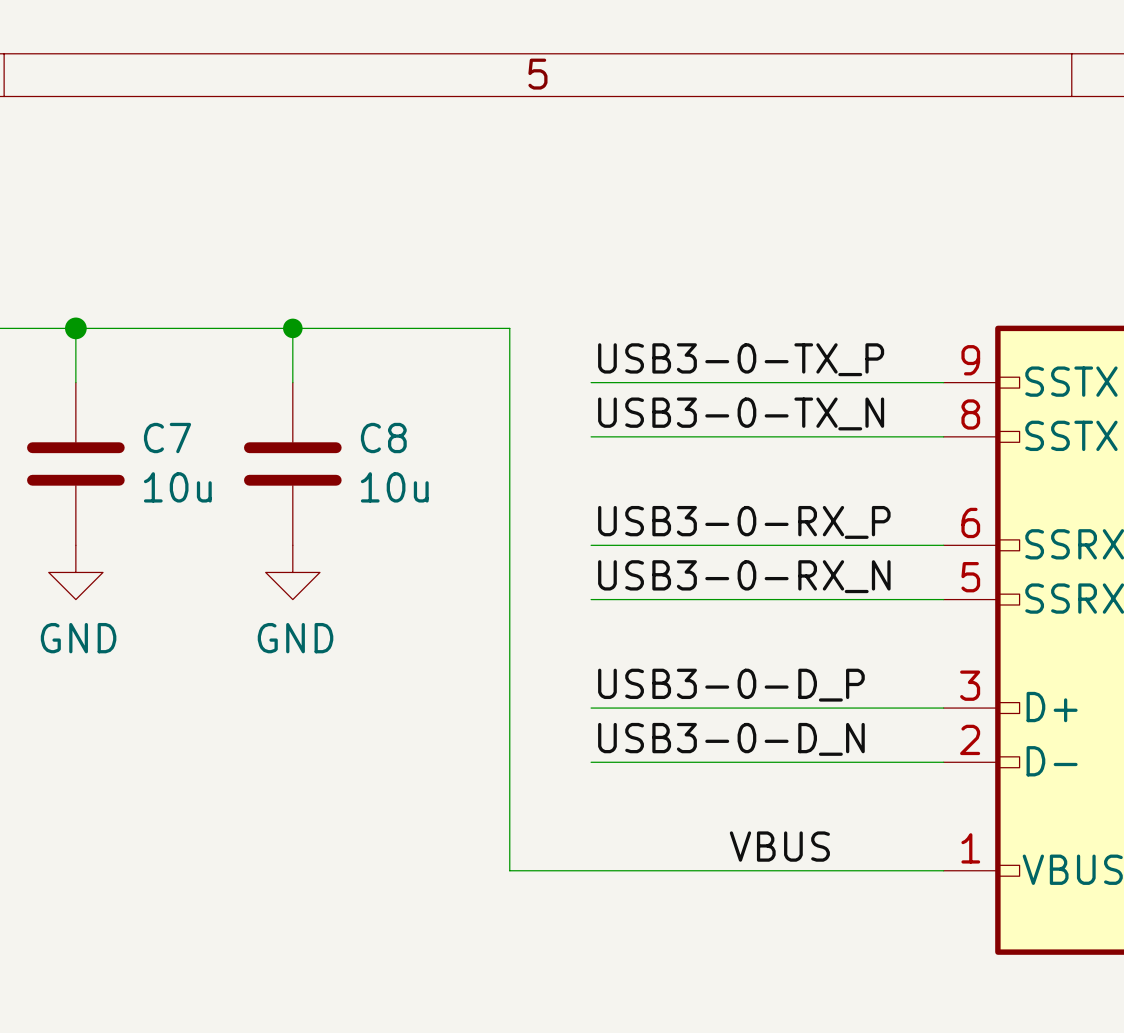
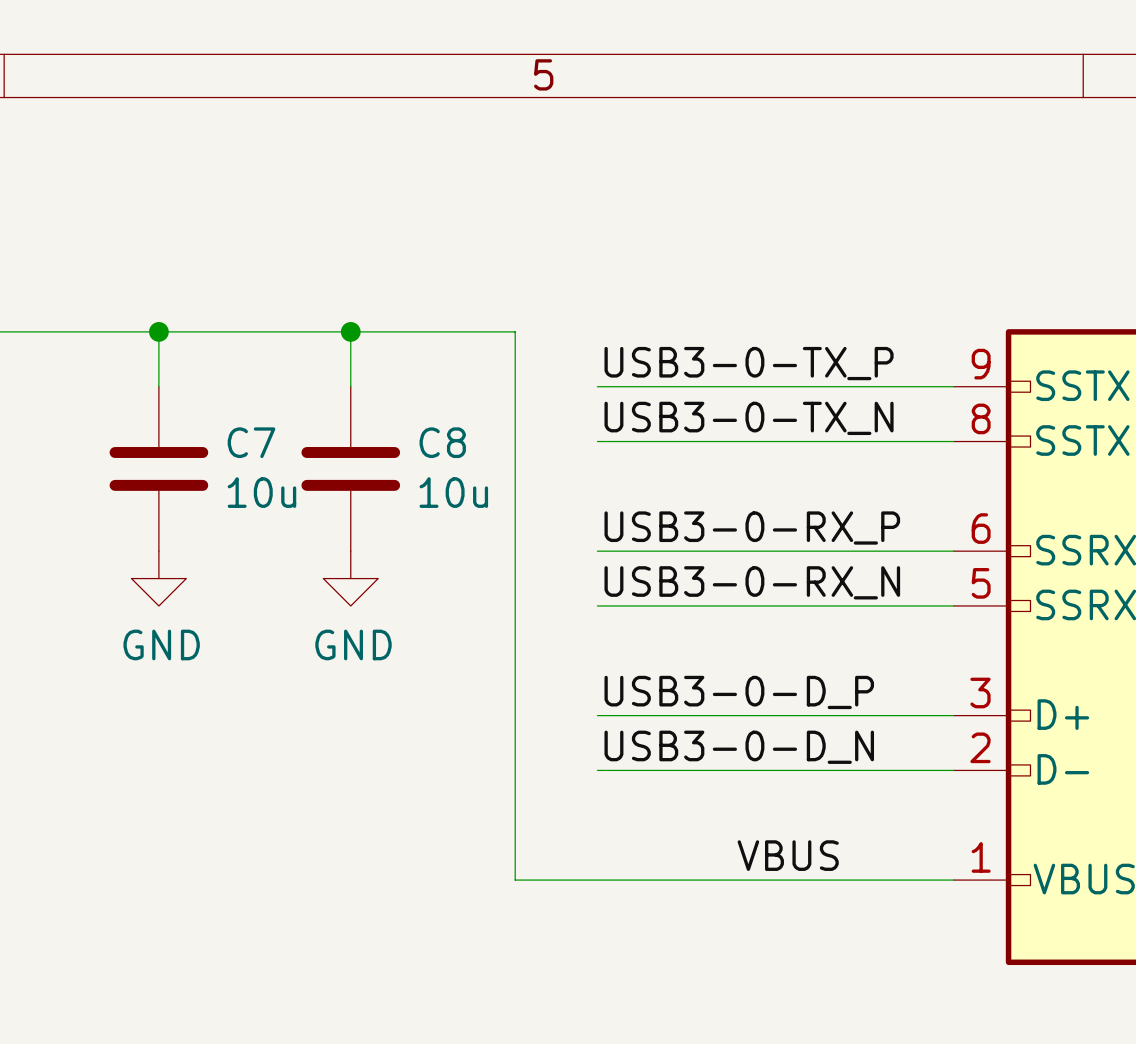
wire: (75, 328) (75, 382) -> (158, 331) (158, 386)
junction: (75, 328) -> none
junction: none -> (158, 331)
wire: (292, 328) (292, 382) -> (350, 331) (350, 386)
junction position: (292, 328) -> (350, 331)
C7 position: (75, 463) -> (158, 468)
C8 position: (292, 463) -> (350, 468)
power symbol: GND (75, 572) -> none
power symbol: none -> GND (158, 578)
power symbol position: GND (292, 572) -> GND (350, 578)

